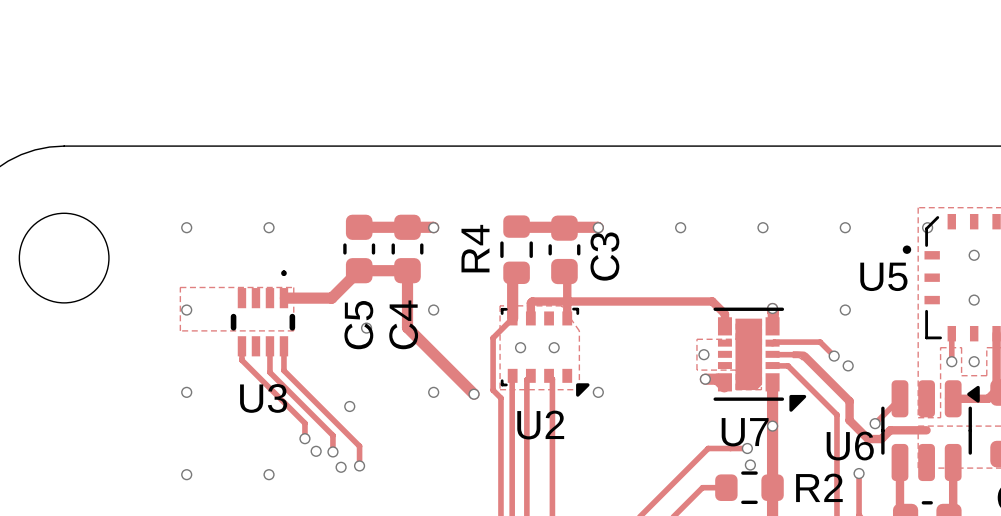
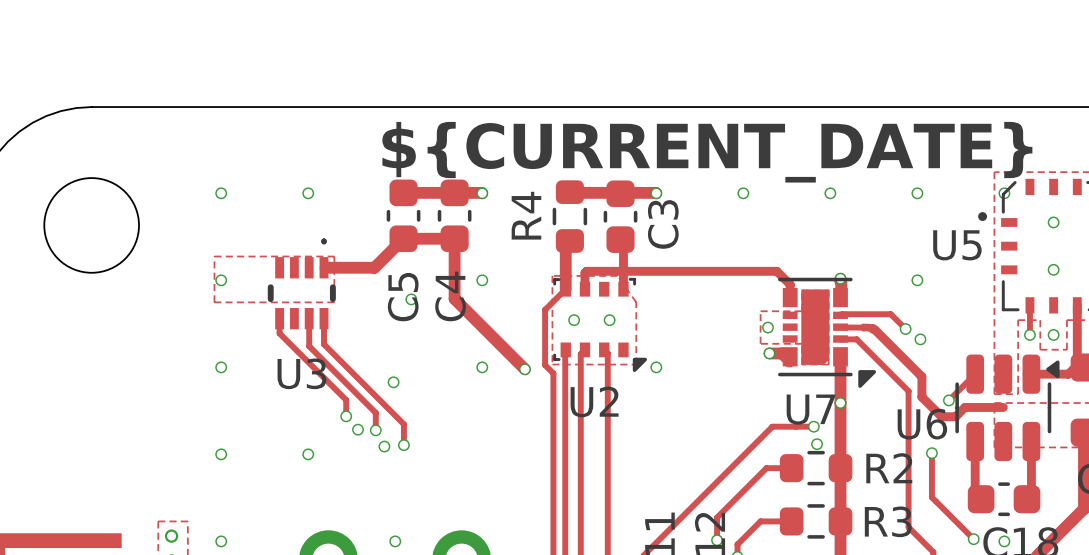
text: none -> ${CURRENT_DATE} (707, 152)

